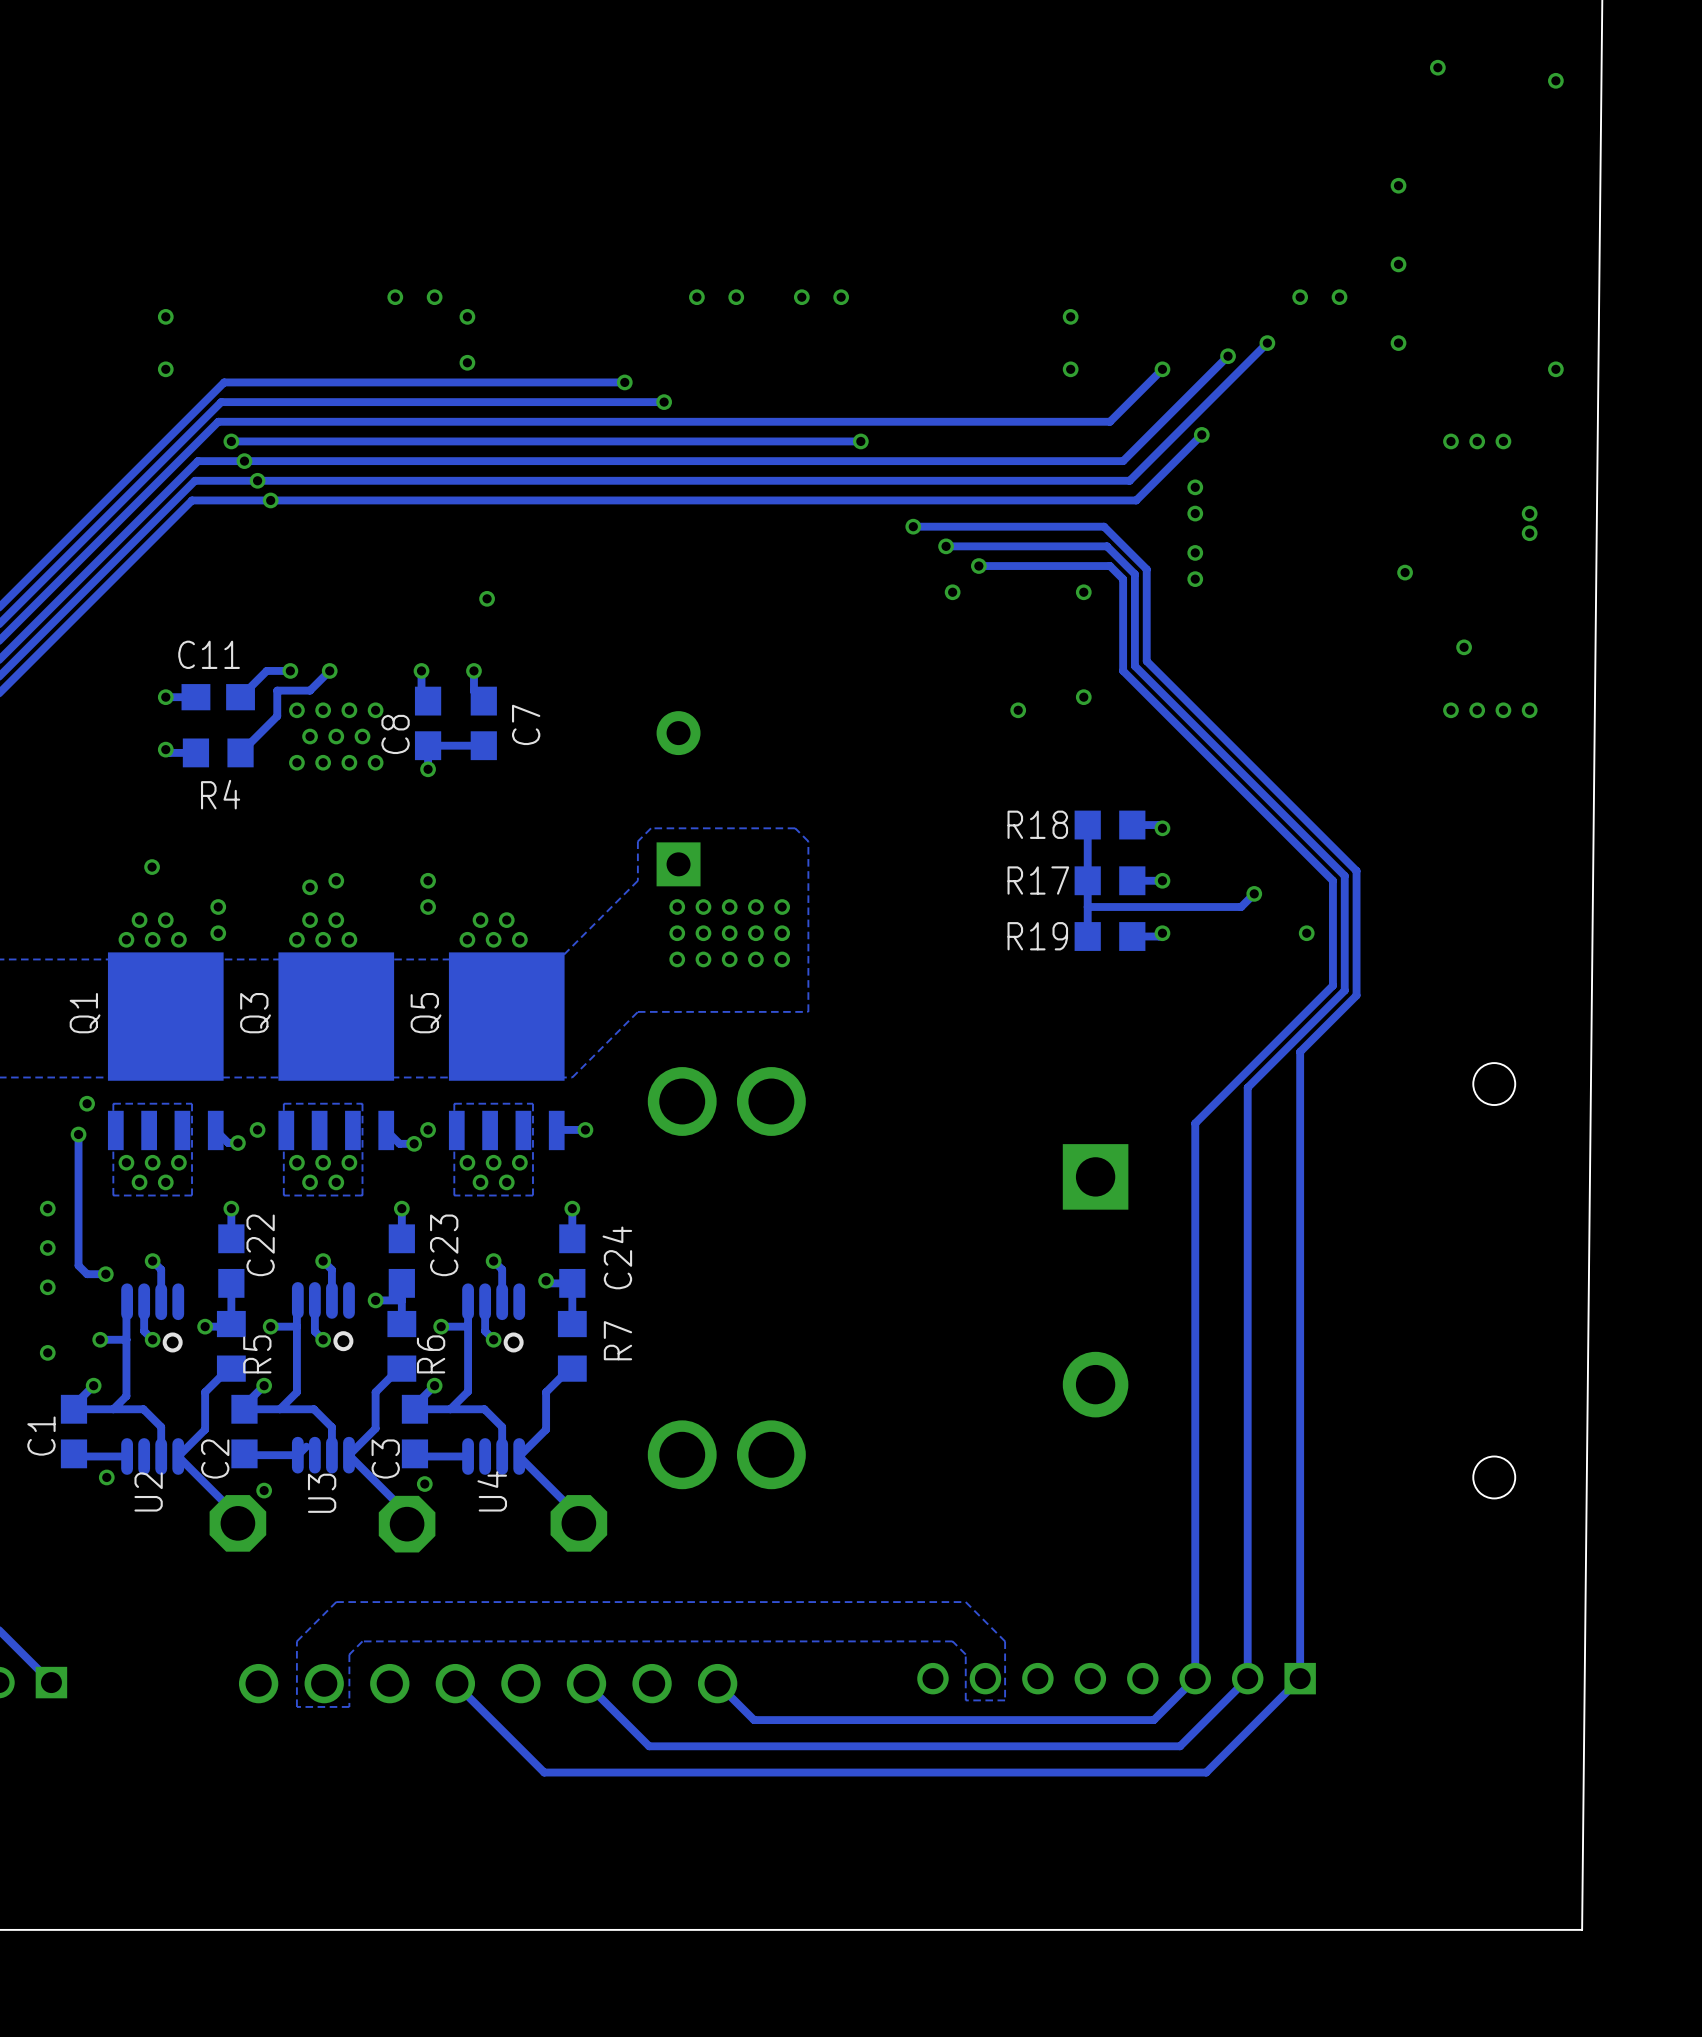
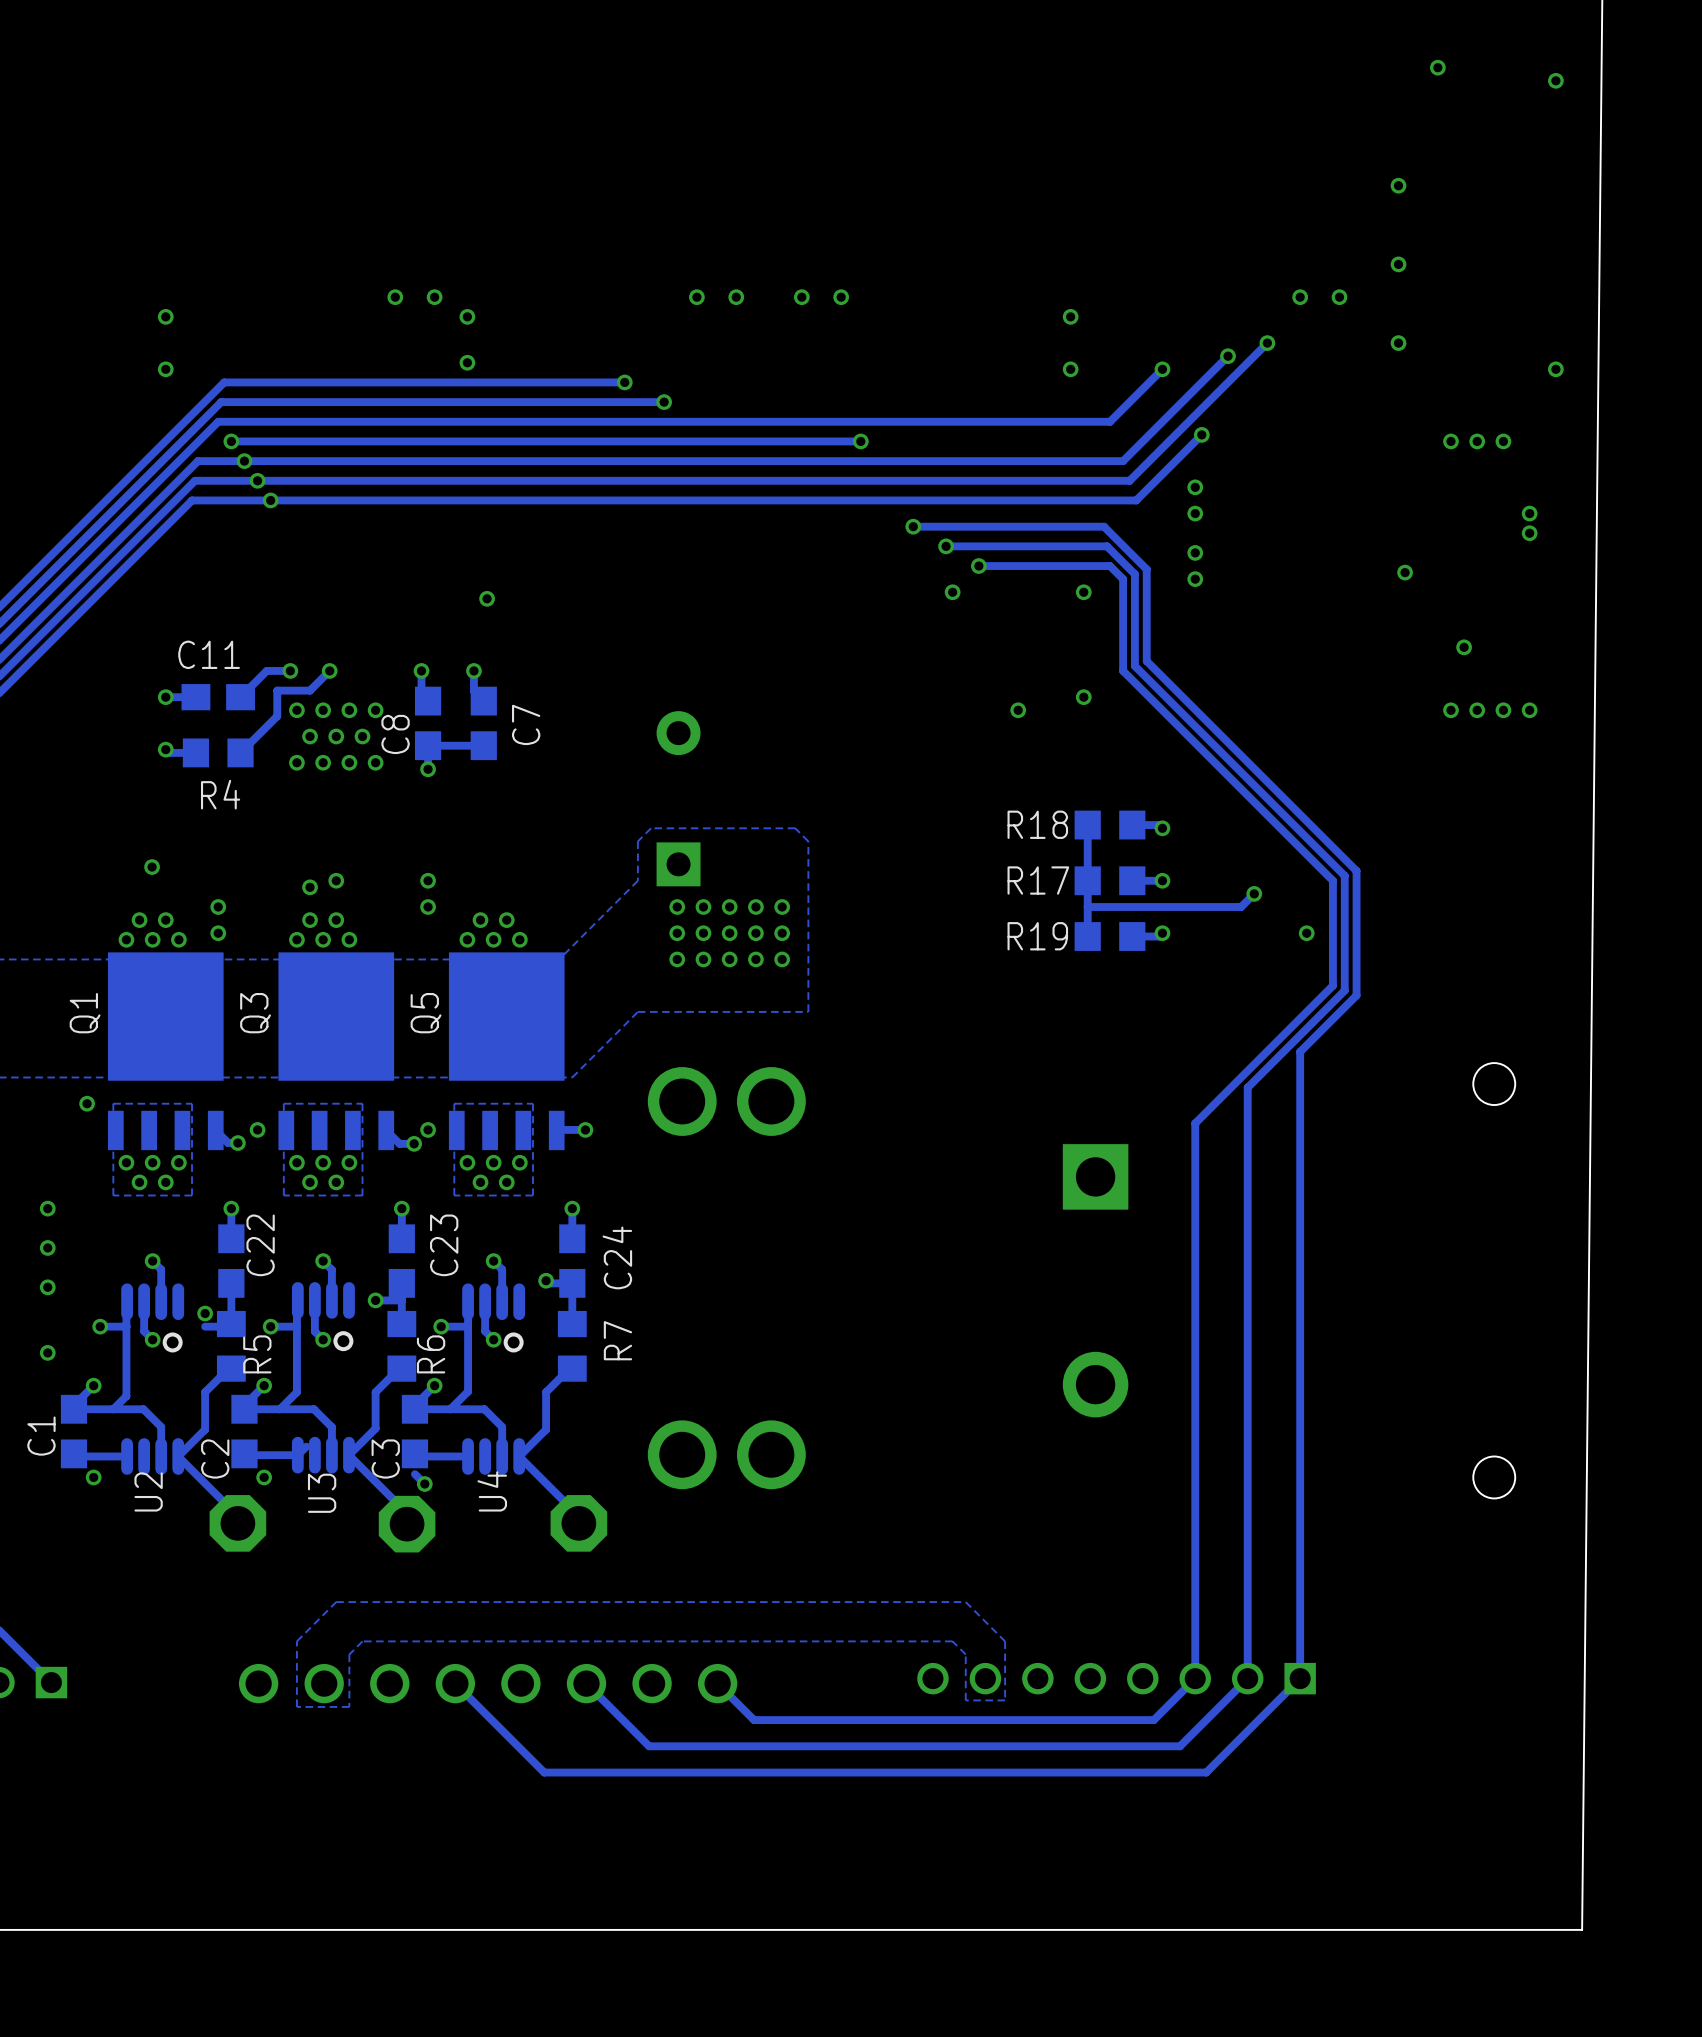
track: (78, 1134) (78, 1265) (87, 1274) (105, 1274) -> none
via: (78, 1134) -> none
via: (105, 1274) -> none
via position: (205, 1326) -> (205, 1313)
via position: (100, 1339) -> (100, 1326)
track: (126, 1339) (100, 1339) -> (126, 1326) (100, 1326)
track: none -> (414, 1474) (424, 1484)
via position: (106, 1477) -> (93, 1477)
via position: (264, 1490) -> (264, 1477)

